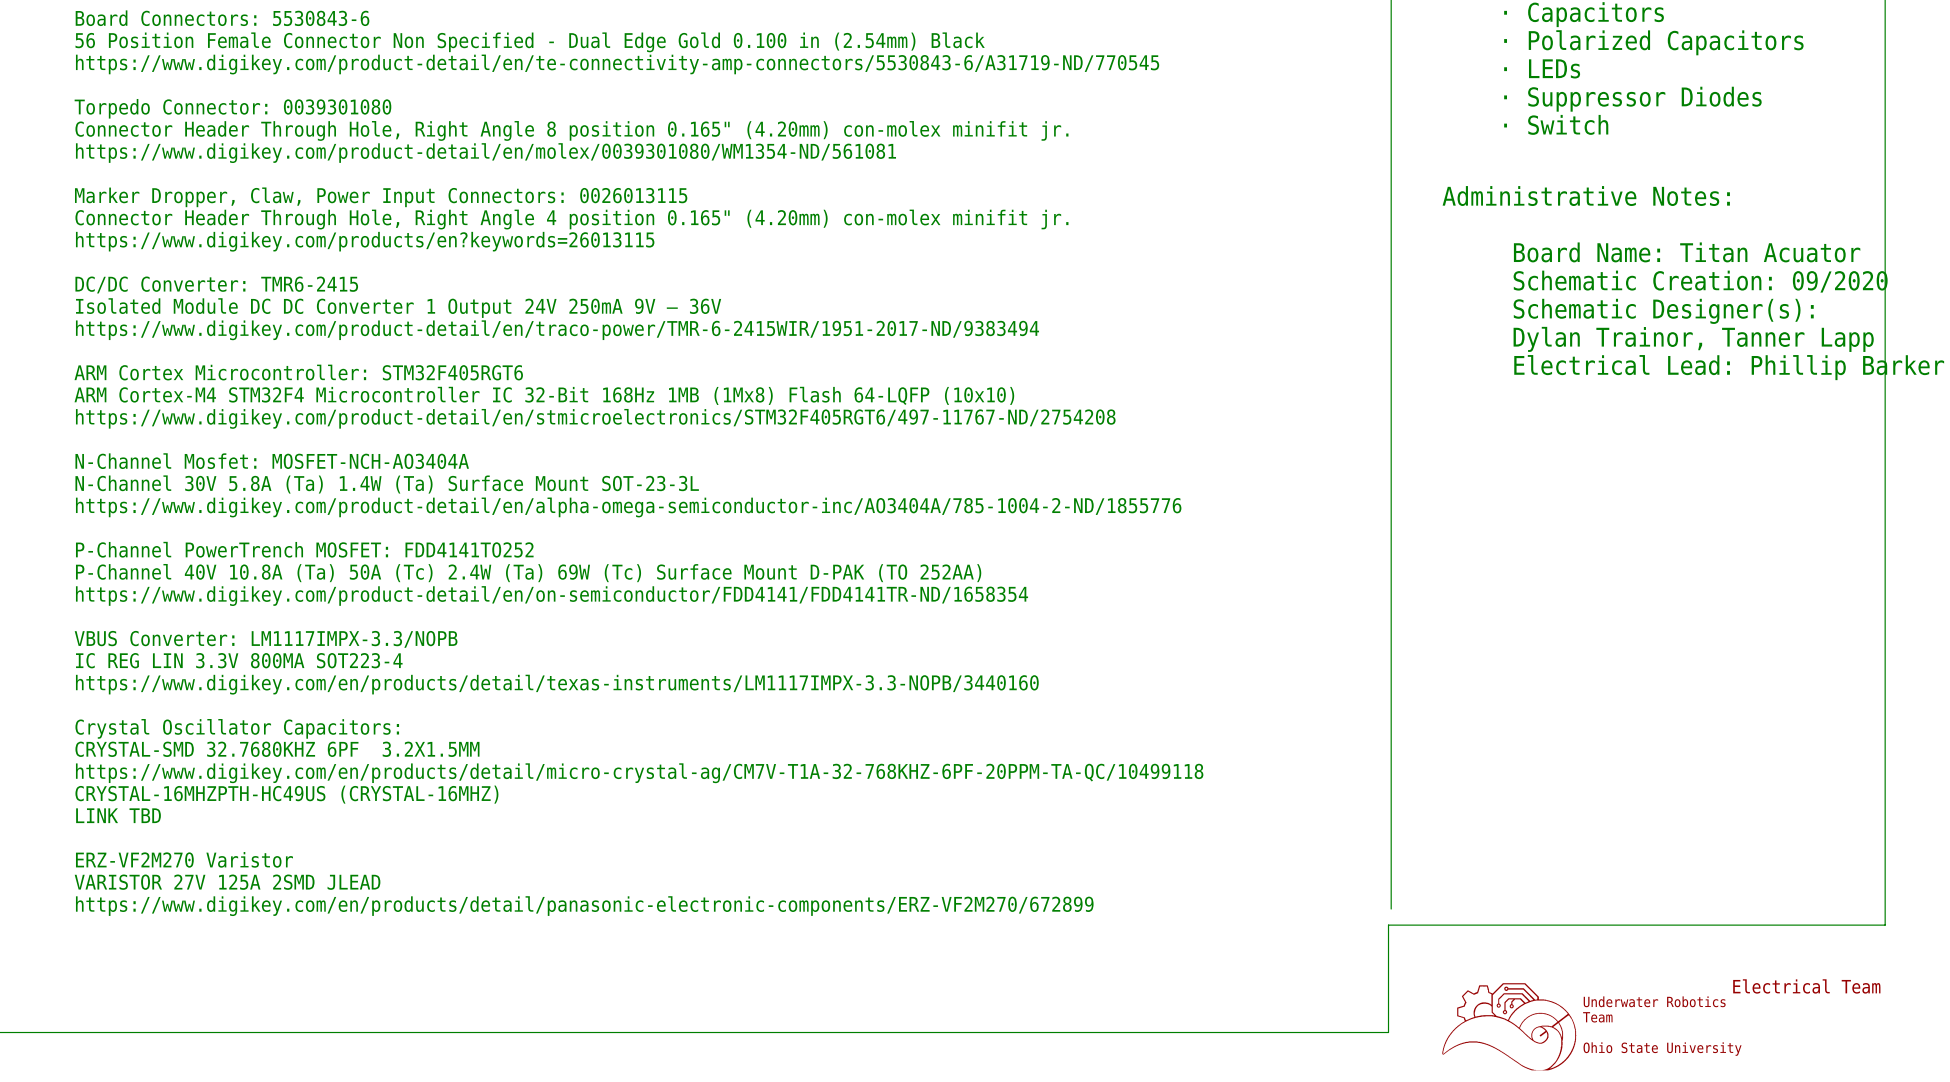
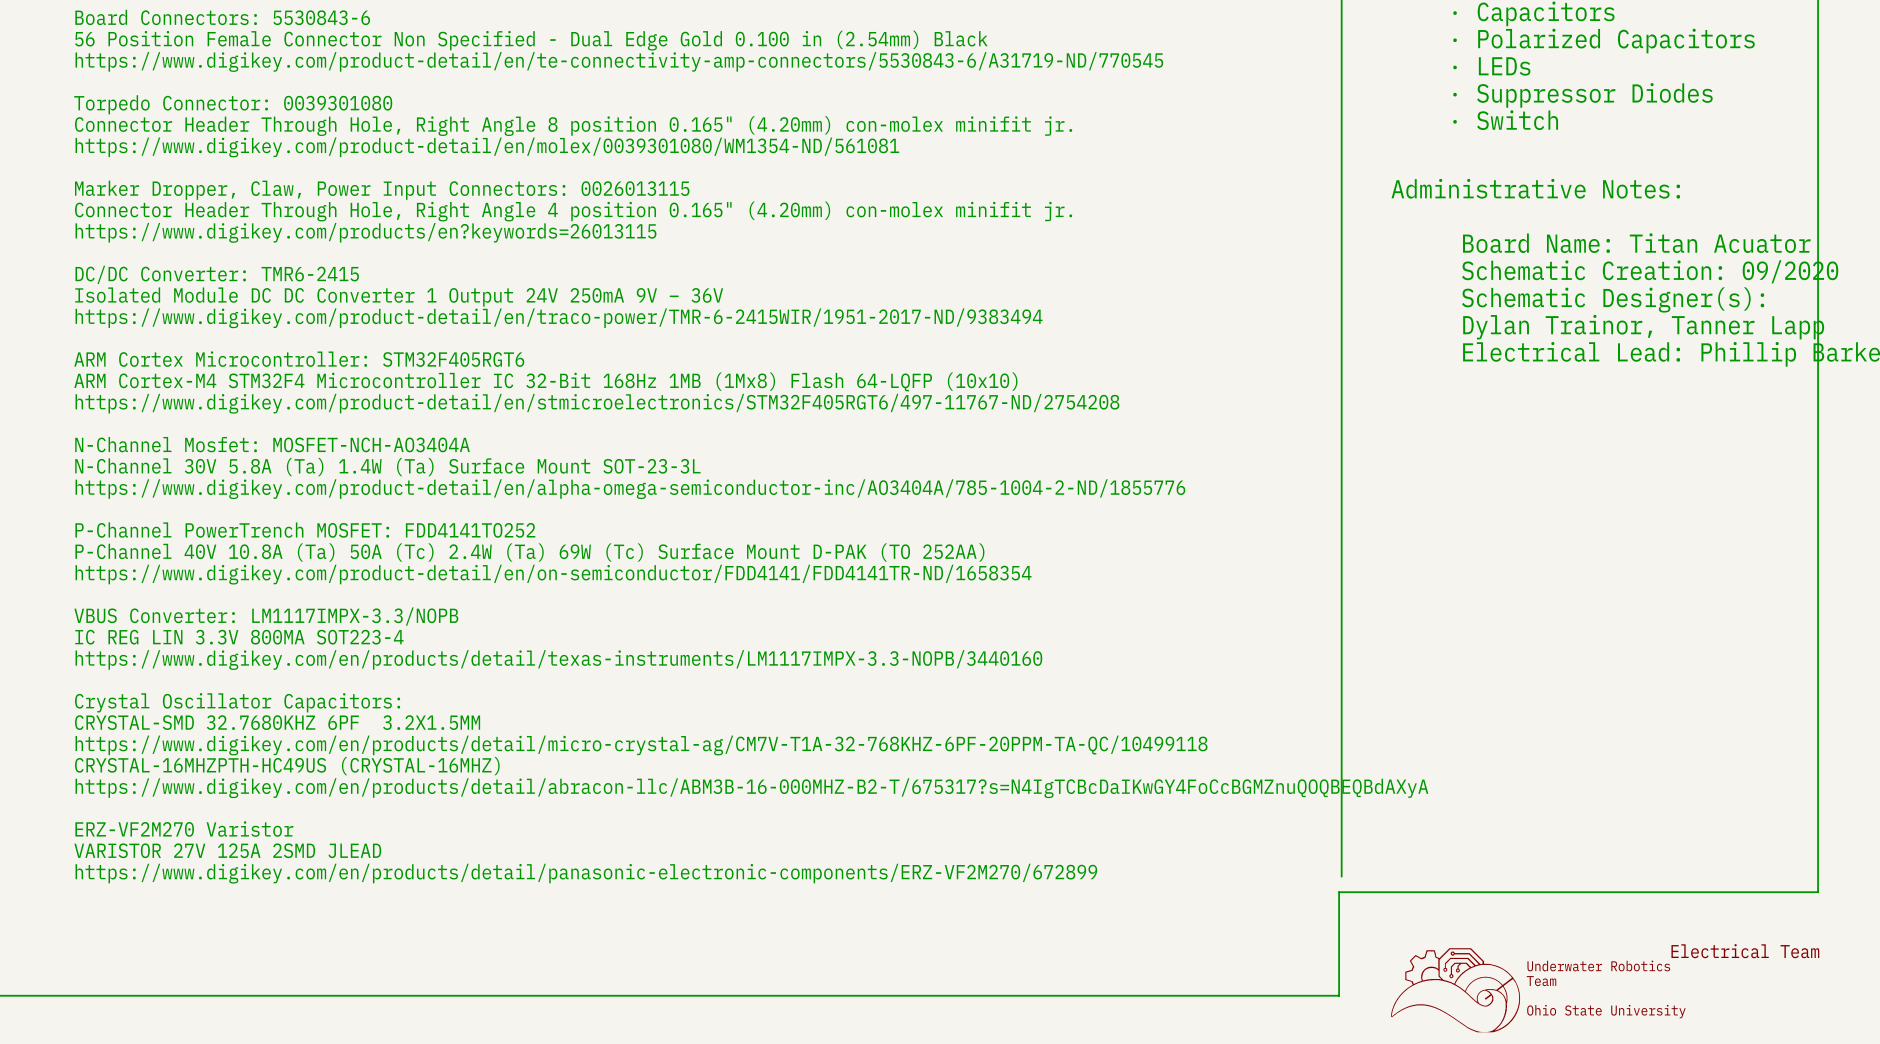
text: LINK TBD (118, 815) -> https://www.digikey.com/en/products/detail/abracon-llc/ABM3B-16-000MHZ-B2-T/675317?s=N4IgTCBcDaIKwGY4FoCcBGMZnuQOQBEQBdAXyA (751, 788)

